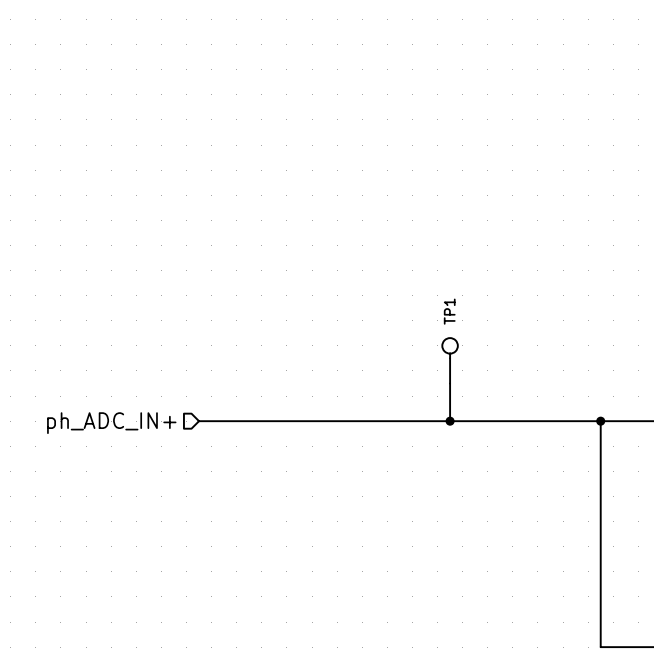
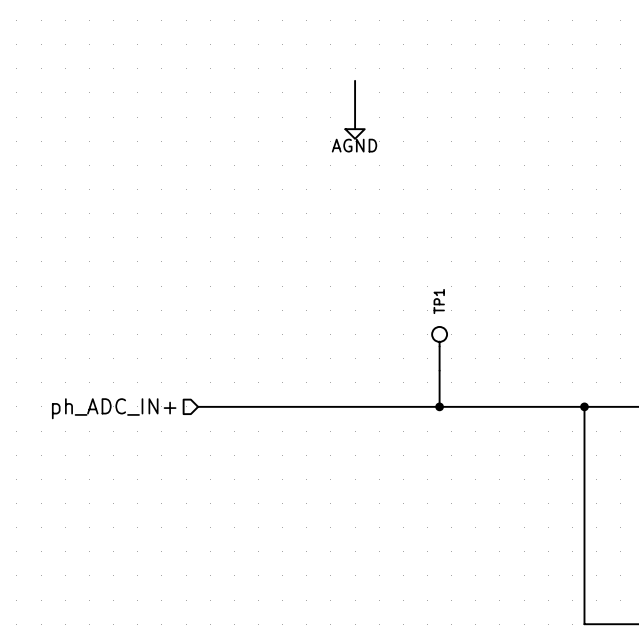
wire: none -> (355, 80) (355, 129)
power symbol: none -> AGND (355, 133)

